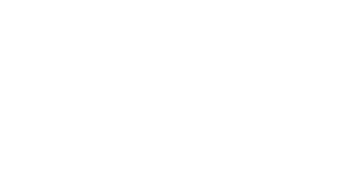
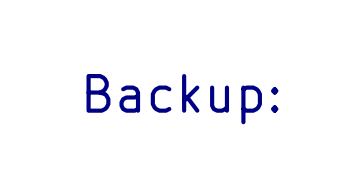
text: none -> Backup: (182, 99)

